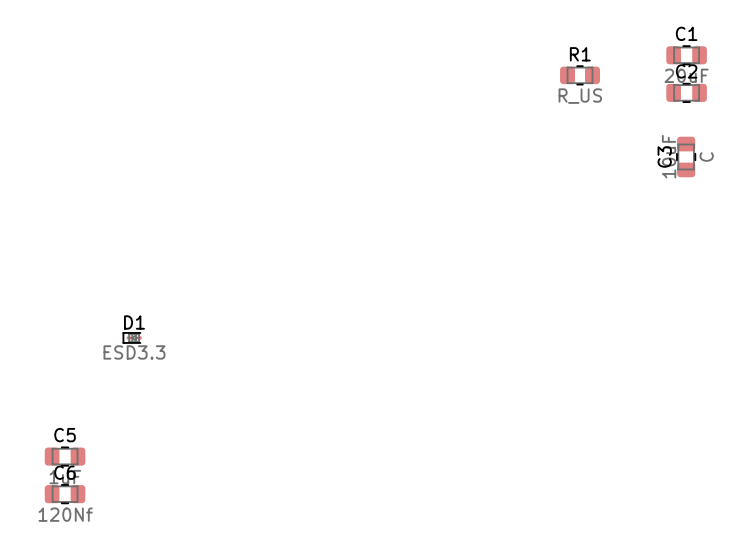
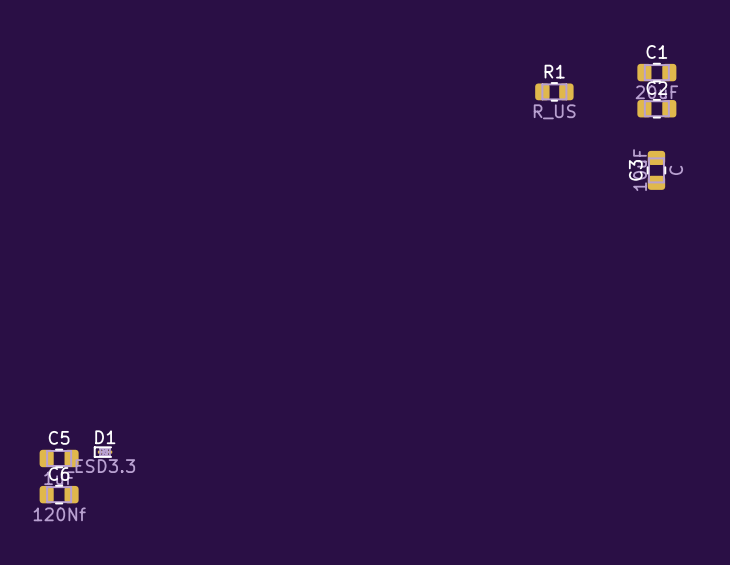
D1 position: (132, 337) -> (103, 452)

